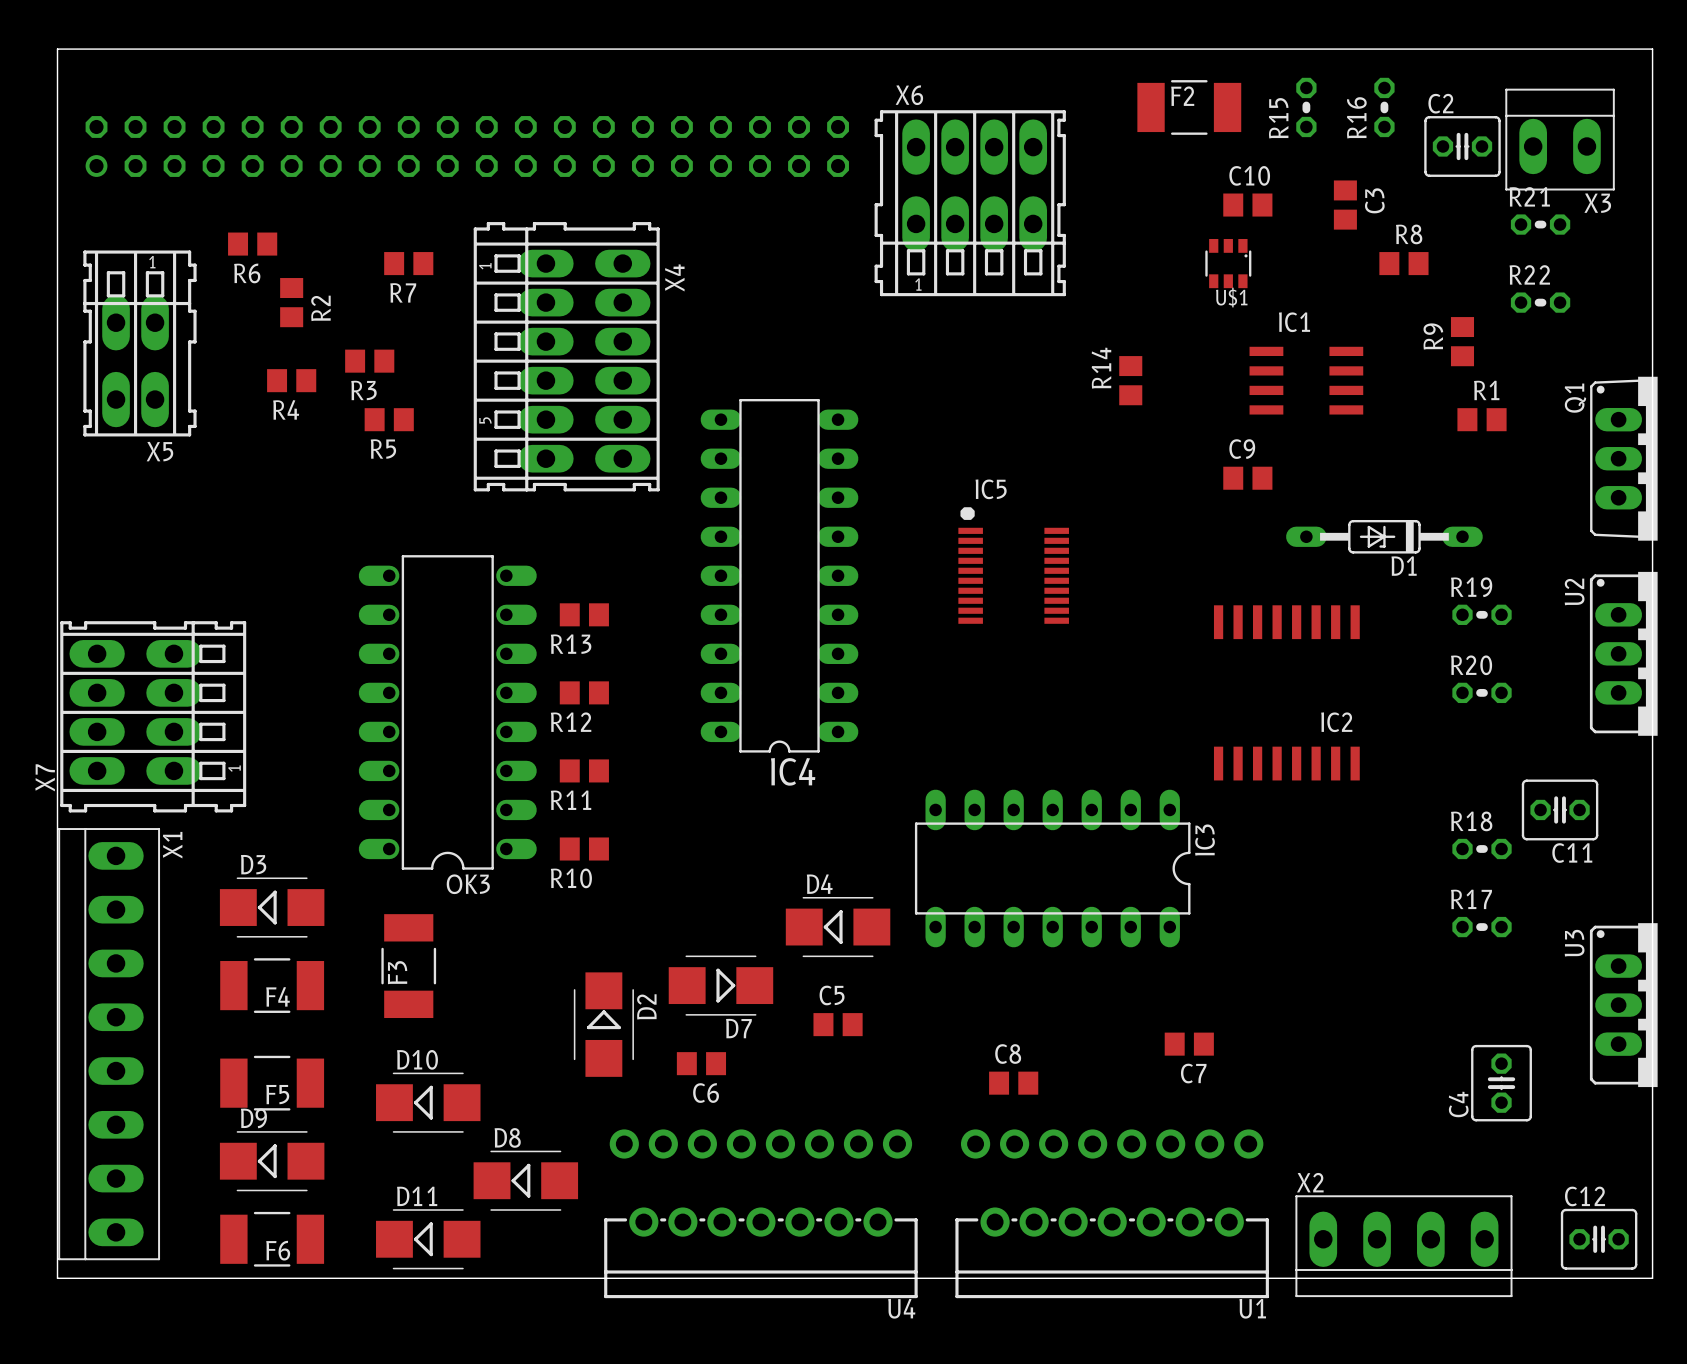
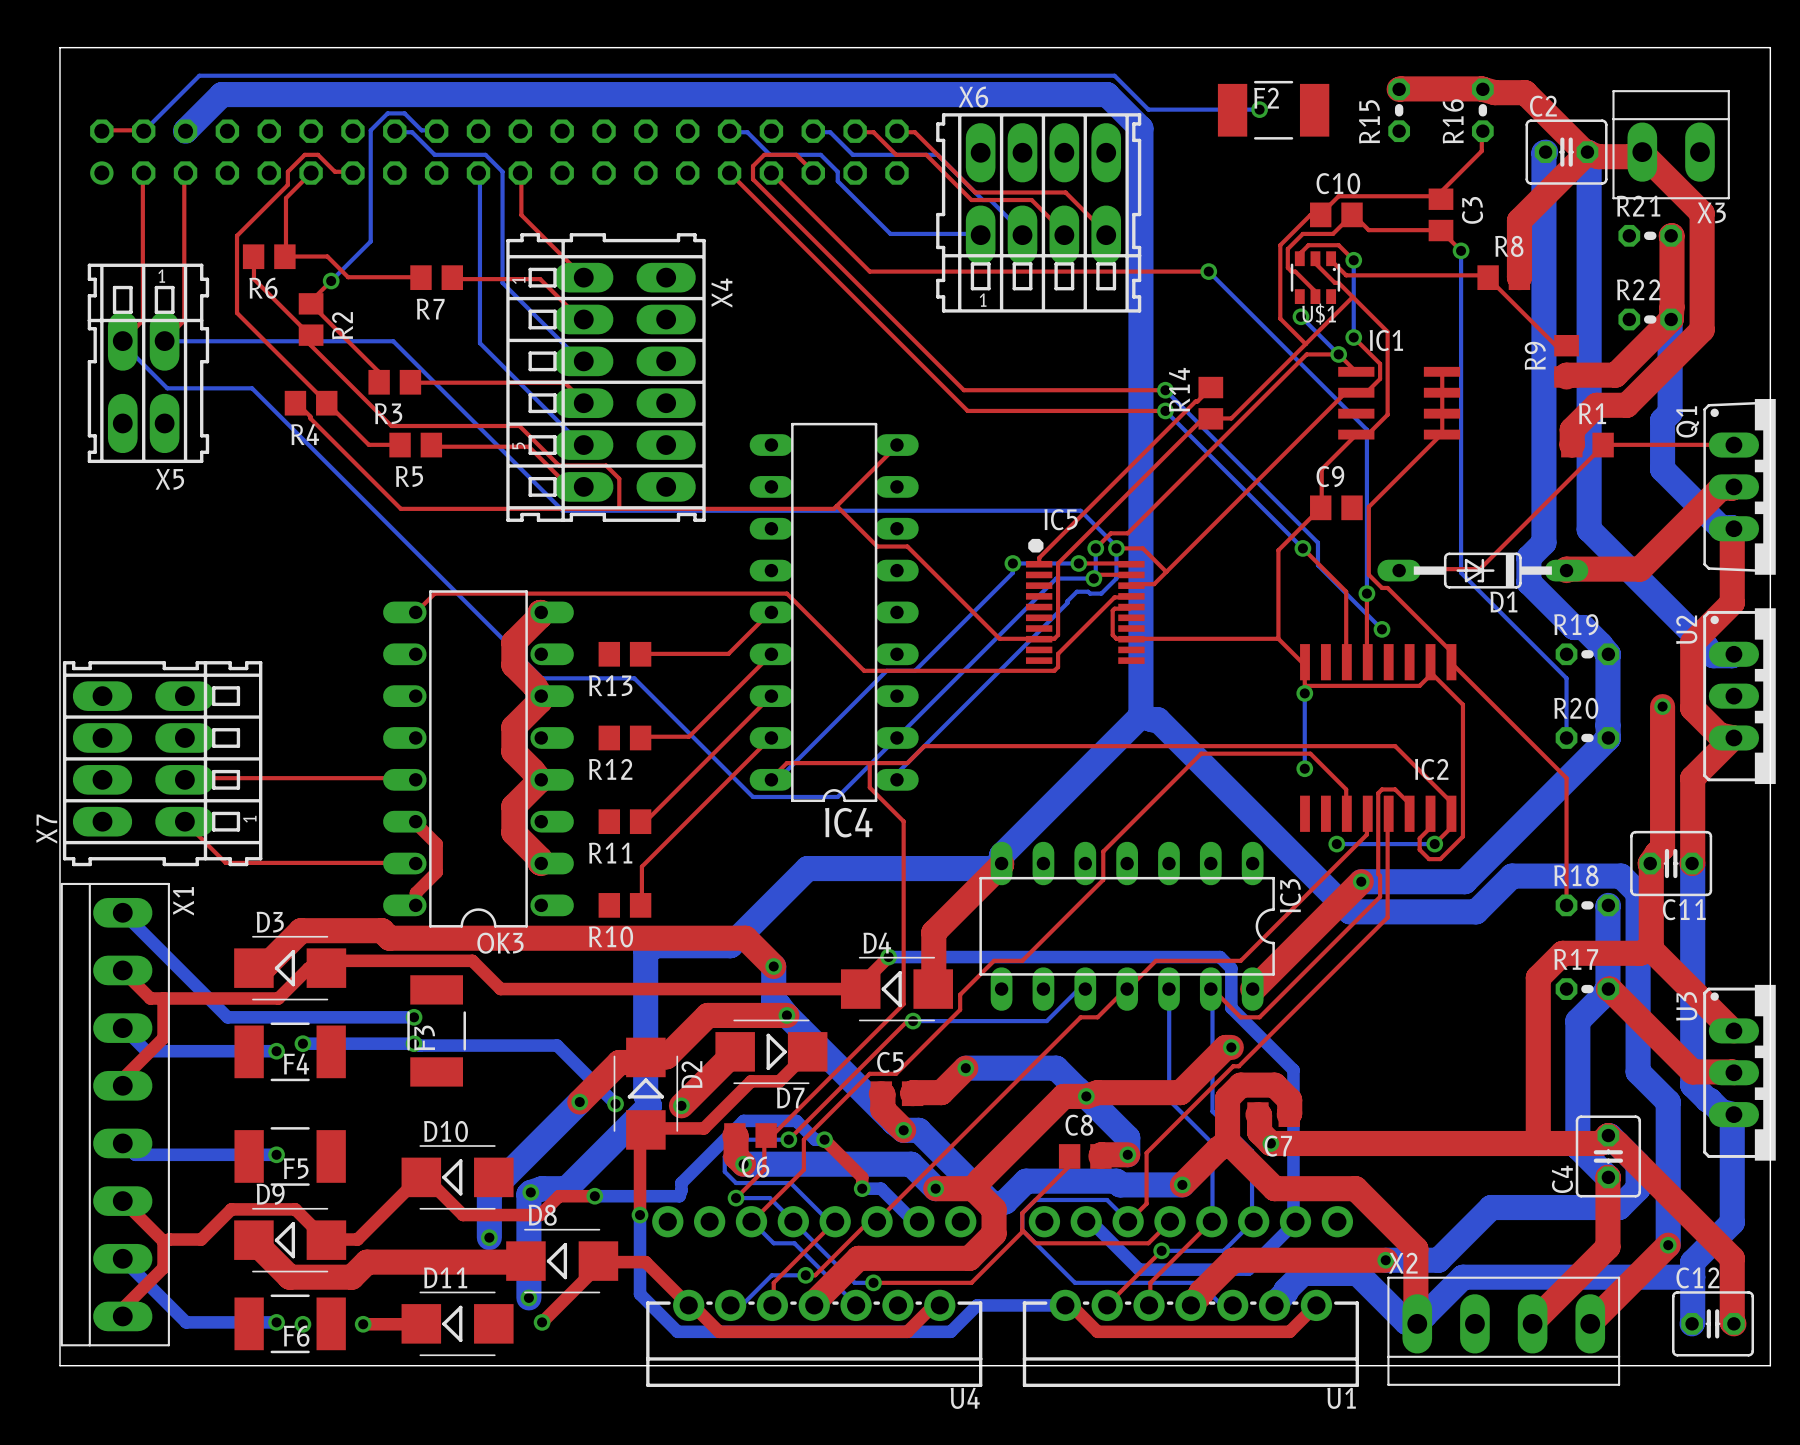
top track: none -> (1399, 89) (1481, 88) (1494, 92) (1525, 92) (1586, 153)
bottom track: none -> (1259, 109) (1148, 109) (1114, 75) (199, 75) (143, 131)
via: none -> (1259, 109)
top track: none -> (101, 131) (143, 131)
bottom track: none -> (185, 131) (221, 94) (1107, 94) (1140, 128) (1140, 716)
bottom track: none -> (394, 131) (412, 132) (434, 154) (485, 154) (502, 171) (502, 282) (579, 360) (583, 361)
bottom track: none -> (436, 131) (421, 130) (404, 113) (387, 113) (370, 130) (370, 241) (331, 281)
bottom track: none -> (729, 131) (747, 132) (769, 154) (820, 154) (837, 171) (837, 181) (890, 233) (980, 235)
bottom track: none -> (813, 131) (830, 132) (852, 154) (937, 154) (982, 200) (990, 200) (1024, 233) (1022, 235)
top track: none -> (855, 131) (873, 132) (896, 154) (926, 154) (971, 200) (1031, 200) (1065, 233) (1064, 235)
top track: none -> (896, 131) (914, 132) (975, 192) (1065, 192) (1106, 235)
top track: none -> (1482, 131) (1481, 151) (1438, 194) (1440, 199) (1438, 196) (1338, 196) (1320, 214) (1310, 215) (1280, 245) (1280, 318) (1305, 344)
bottom track: none -> (1545, 152) (1543, 152) (1543, 542) (1528, 557) (1528, 582) (1574, 627) (1583, 627) (1608, 654) (1608, 737) (1464, 881) (1361, 881)
bottom track: none -> (1587, 152) (1589, 152) (1589, 529) (1713, 655) (1733, 654)
top track: none -> (1587, 152) (1519, 220) (1519, 277)
top track: none -> (1587, 152) (1598, 156) (1630, 156) (1642, 152) (1702, 213) (1702, 329) (1626, 405) (1596, 405) (1572, 429) (1571, 445)
top track: none -> (143, 173) (142, 320) (122, 341)
top track: none -> (185, 173) (184, 320) (164, 341)
top track: none -> (311, 173) (285, 198) (284, 256) (327, 256) (348, 277) (420, 277)
top track: none -> (352, 173) (334, 171) (317, 154) (304, 154) (287, 171) (287, 184) (237, 235) (237, 313) (368, 444) (400, 445)
bottom track: none -> (478, 173) (479, 343) (583, 446) (583, 445)
top track: none -> (520, 173) (521, 215) (583, 277)
top track: none -> (729, 173) (967, 410) (1165, 410)
top track: none -> (771, 173) (869, 271) (1208, 271)
top track: none -> (813, 173) (796, 154) (764, 154) (753, 166) (753, 179) (963, 390) (1165, 390)
top track: none -> (1352, 214) (1368, 230) (1440, 230) (1461, 250)
top track: none -> (1351, 215) (1333, 233) (1302, 233) (1287, 248) (1287, 267) (1291, 271) (1295, 271) (1314, 290) (1315, 296)
top track: none -> (1671, 235) (1671, 319) (1615, 375) (1566, 375) (1566, 377)
bottom track: none -> (1461, 250) (1461, 572) (1566, 678) (1566, 737)
via: none -> (1461, 250)
top track: none -> (253, 256) (253, 279) (311, 335) (310, 345) (391, 426) (519, 426) (559, 465) (606, 465) (619, 478) (619, 508)
top track: none -> (1299, 258) (1301, 252) (1308, 245) (1338, 245) (1353, 260)
top track: none -> (1315, 258) (1316, 264) (1334, 282) (1338, 282) (1387, 331) (1387, 414) (1368, 433) (1357, 433) (1321, 469) (1321, 506) (1278, 550) (1278, 638)
top track: none -> (1331, 258) (1346, 275) (1485, 275) (1555, 345) (1566, 345)
bottom track: none -> (1353, 260) (1353, 337)
via: none -> (1353, 260)
bottom track: none -> (1208, 271) (1366, 429) (1366, 593)
via: none -> (1208, 271)
top track: none -> (452, 277) (540, 279) (579, 318) (583, 319)
top track: none -> (331, 281) (310, 301) (311, 303) (378, 371) (379, 382)
via: none -> (331, 281)
top track: none -> (1352, 297) (1231, 418) (1203, 418) (1058, 563) (1058, 635) (1054, 638) (999, 638) (907, 546) (877, 546) (836, 506)
bottom track: none -> (1301, 316) (1338, 354)
via: none -> (1301, 316)
bottom track: none -> (1671, 319) (1670, 412) (1662, 420) (1662, 469) (1720, 527) (1733, 528)
top track: none -> (1353, 337) (1380, 363) (1380, 378) (1366, 392) (1344, 393) (1154, 584) (1131, 585)
via: none -> (1353, 337)
bottom track: none -> (122, 341) (124, 345) (167, 388) (252, 388) (542, 678) (634, 678) (753, 796) (837, 796) (1056, 578) (1095, 578) (1095, 548)
bottom track: none -> (164, 341) (393, 341) (562, 510) (1080, 510) (1116, 546) (1116, 578) (1101, 593) (1076, 591) (898, 772) (896, 779)
via: none -> (1338, 354)
top track: none -> (1356, 371) (1338, 354) (1306, 354) (1127, 533) (1110, 533) (1095, 548)
top track: none -> (1441, 371) (1441, 434) (1368, 506) (1368, 574) (1381, 587) (1387, 587) (1449, 650) (1449, 661) (1566, 778) (1566, 905)
top track: none -> (410, 382) (564, 382) (583, 403)
top track: none -> (1210, 387) (1039, 557) (1039, 564)
bottom track: none -> (1165, 390) (1317, 542) (1317, 565) (1381, 629)
via: none -> (1165, 390)
top track: none -> (295, 403) (400, 508) (833, 508) (896, 445)
bottom track: none -> (1165, 410) (1302, 548)
via: none -> (1165, 410)
top track: none -> (431, 445) (432, 446) (528, 446) (568, 486) (583, 486)
top track: none -> (1733, 445) (1603, 445) (1479, 569) (1399, 570)
top track: none -> (1733, 486) (1720, 488) (1639, 569) (1566, 570)
top track: none -> (1733, 528) (1732, 529) (1732, 603) (1692, 642) (1692, 708) (1719, 734) (1733, 737) (1692, 778) (1692, 863)
via: none -> (1095, 548)
top track: none -> (1116, 548) (1142, 548) (1166, 571)
via: none -> (1116, 548)
top track: none -> (1302, 548) (1346, 591) (1346, 662)
via: none -> (1302, 548)
via: none -> (1012, 563)
top track: none -> (1078, 563) (1131, 564)
bottom track: none -> (1078, 563) (1012, 563) (1012, 572) (914, 670) (886, 670) (779, 778) (771, 778) (771, 779)
via: none -> (1078, 563)
top track: none -> (1131, 574) (1097, 574) (1093, 578)
via: none -> (1093, 578)
top track: none -> (1366, 593) (1367, 662)
via: none -> (1366, 593)
top track: none -> (1131, 596) (1114, 597) (1058, 653) (1058, 667) (1054, 670) (864, 670) (786, 593) (434, 593) (415, 612)
top track: none -> (1131, 607) (1114, 608) (1112, 610) (1112, 635) (1116, 638) (1278, 638)
top track: none -> (541, 612) (540, 616) (513, 642) (513, 665) (534, 685) (541, 696) (540, 700) (513, 727) (513, 751) (540, 780)
top track: none -> (771, 612) (728, 653) (640, 654)
via: none -> (1381, 629)
top track: none -> (1278, 638) (1302, 663) (1304, 662) (1304, 693) (1306, 685) (1419, 685) (1430, 674) (1430, 662) (1430, 672) (1462, 704) (1462, 836) (1440, 859) (1429, 859) (1419, 849) (1419, 838) (1429, 829) (1430, 813)
top track: none -> (771, 654) (688, 736) (640, 737)
bottom track: none -> (1304, 693) (1304, 768)
via: none -> (1304, 693)
top track: none -> (771, 696) (645, 821) (640, 821)
top track: none -> (1662, 706) (1662, 847) (1650, 863) (1651, 949)
via: none -> (1662, 706)
bottom track: none -> (1140, 716) (1001, 855) (1001, 863) (990, 868) (807, 868) (730, 945) (656, 945) (645, 949) (645, 1094) (649, 1105) (566, 1188) (542, 1188) (528, 1194) (528, 1297)
bottom track: none -> (1140, 716) (1157, 719) (1349, 911) (1476, 911) (1511, 876) (1621, 876) (1638, 893) (1638, 1071) (1668, 1102) (1668, 1245)
top track: none -> (771, 737) (641, 866) (640, 905)
top track: none -> (869, 763) (869, 787) (903, 821) (903, 1004) (771, 1135) (764, 1135) (764, 1169) (736, 1198)
via: none -> (1304, 768)
top track: none -> (184, 779) (186, 778) (414, 778) (415, 779)
top track: none -> (771, 779) (786, 763) (907, 763) (924, 746) (1395, 746) (1449, 800) (1451, 813) (1449, 813) (1449, 829) (1434, 844)
top track: none -> (540, 780) (513, 806) (513, 832) (540, 859) (541, 863)
top track: none -> (1346, 813) (1346, 789) (1310, 753) (1201, 753) (1103, 851) (1103, 879) (1022, 960) (994, 960) (960, 994) (960, 1009) (896, 1073) (869, 1073) (803, 1139) (803, 1169) (751, 1221)
top track: none -> (1367, 813) (1366, 834) (1240, 960) (1156, 960) (1097, 1017) (1080, 1017) (877, 1221) (867, 1222) (815, 1275) (805, 1275)
top track: none -> (1388, 813) (1387, 917) (1238, 1066) (1233, 1066) (1146, 1152) (1146, 1203) (1128, 1221)
top track: none -> (1409, 813) (1408, 802) (1395, 789) (1381, 789) (1378, 793) (1380, 896) (1259, 1017) (1240, 1017) (1210, 989)
top track: none -> (184, 821) (225, 862) (415, 863)
top track: none -> (415, 821) (436, 844) (436, 872) (415, 893) (415, 905)
bottom track: none -> (1336, 844) (1434, 844)
via: none -> (1336, 844)
via: none -> (1434, 844)
top track: none -> (1001, 863) (933, 932) (933, 989)
bottom track: none -> (1692, 863) (1692, 1085) (1720, 1111) (1733, 1114) (1732, 1115) (1732, 1222) (1692, 1262) (1692, 1323)
top track: none -> (1361, 881) (1252, 989)
via: none -> (1361, 881)
bottom track: none -> (1608, 905) (1607, 989)
bottom track: none -> (122, 912) (227, 1017) (414, 1017)
top track: none -> (1651, 949) (1733, 1030)
top track: none -> (1651, 949) (1639, 953) (1562, 953) (1538, 977) (1538, 1143)
top track: none -> (888, 957) (862, 983) (860, 989) (500, 989) (472, 960) (334, 960) (326, 968) (308, 968) (278, 998) (150, 998) (122, 970)
bottom track: none -> (888, 957) (1220, 957) (1231, 968) (1231, 1007) (1293, 1070) (1293, 1216) (1295, 1222) (1248, 1269) (1139, 1269) (1091, 1222) (1086, 1221)
via: none -> (888, 957)
top track: none -> (773, 966) (745, 938) (389, 938) (382, 930) (301, 930) (265, 966) (253, 966) (253, 968)
bottom track: none -> (773, 966) (773, 1000) (786, 1015) (894, 1122) (903, 1130) (918, 1130) (994, 1205) (1005, 1201) (1026, 1181) (1116, 1181) (1120, 1184) (1182, 1184)
via: none -> (773, 966)
bottom track: none -> (1085, 989) (1078, 989) (1046, 1021) (913, 1021)
bottom track: none -> (1169, 989) (1169, 1100) (1212, 1143) (1211, 1221)
bottom track: none -> (1210, 989) (1212, 989) (1212, 1111) (1252, 1151) (1252, 1220) (1253, 1221) (1223, 1250) (1161, 1250)
top track: none -> (1608, 989) (1692, 1071) (1733, 1072)
bottom track: none -> (1607, 989) (1577, 1021) (1577, 1147) (1608, 1177)
top track: none -> (163, 998) (163, 1038) (124, 1077) (122, 1085)
top track: none -> (786, 1015) (707, 1015) (666, 1056) (647, 1056) (634, 1062) (619, 1062) (579, 1102)
via: none -> (786, 1015)
via: none -> (414, 1017)
top track: none -> (913, 1021) (907, 1021) (788, 1139)
via: none -> (913, 1021)
bottom track: none -> (122, 1028) (146, 1051) (276, 1051)
bottom track: none -> (302, 1043) (557, 1045) (615, 1103)
via: none -> (302, 1043)
via: none -> (414, 1043)
top track: none -> (1231, 1047) (1225, 1047) (1180, 1092) (1097, 1092) (1086, 1096) (1063, 1096) (973, 1188)
via: none -> (1231, 1047)
via: none -> (276, 1051)
top track: none -> (735, 1051) (681, 1105)
top track: none -> (807, 1051) (779, 1081) (751, 1081) (704, 1128) (647, 1128) (640, 1134) (640, 1215)
top track: none -> (965, 1068) (941, 1092) (912, 1093)
bottom track: none -> (965, 1068) (1056, 1068) (1127, 1137) (1127, 1154)
via: none -> (965, 1068)
top track: none -> (881, 1093) (882, 1094) (882, 1109) (903, 1130)
via: none -> (1086, 1096)
bottom track: none -> (579, 1102) (489, 1192) (489, 1237)
via: none -> (579, 1102)
via: none -> (615, 1103)
via: none -> (681, 1105)
top track: none -> (1257, 1114) (1259, 1115) (1259, 1132) (1270, 1143) (1600, 1143) (1608, 1135)
top track: none -> (1289, 1114) (1289, 1100) (1274, 1085) (1240, 1085) (1227, 1098) (1227, 1141)
via: none -> (903, 1130)
top track: none -> (734, 1135) (736, 1156) (743, 1164)
bottom track: none -> (1608, 1135) (1638, 1164) (1638, 1188) (1619, 1207) (1491, 1207) (1438, 1260) (1385, 1260)
top track: none -> (1607, 1135) (1732, 1258) (1732, 1322) (1733, 1323)
bottom track: none -> (788, 1139) (741, 1139) (724, 1156) (724, 1171) (736, 1183) (790, 1183) (828, 1220) (835, 1221)
via: none -> (788, 1139)
top track: none -> (824, 1139) (862, 1177) (862, 1188)
bottom track: none -> (824, 1139) (815, 1139) (796, 1120) (743, 1120) (681, 1183) (679, 1196) (594, 1196)
via: none -> (824, 1139)
top track: none -> (1227, 1141) (1274, 1188) (1355, 1188) (1415, 1248) (1417, 1323)
top track: none -> (1227, 1141) (1182, 1184)
bottom track: none -> (122, 1143) (135, 1154) (276, 1154)
via: none -> (1270, 1143)
via: none -> (276, 1154)
top track: none -> (1127, 1154) (1101, 1154) (1100, 1156)
via: none -> (1127, 1154)
top track: none -> (1069, 1156) (1069, 1166) (1022, 1213) (1022, 1232) (971, 1282) (873, 1282)
bottom track: none -> (743, 1164) (911, 1164) (935, 1188)
via: none -> (743, 1164)
top track: none -> (1608, 1177) (1607, 1247) (1532, 1323)
via: none -> (1182, 1184)
bottom track: none -> (862, 1188) (881, 1188) (913, 1220) (918, 1221)
via: none -> (862, 1188)
top track: none -> (935, 1188) (973, 1188)
via: none -> (935, 1188)
top track: none -> (973, 1188) (994, 1209) (994, 1233) (969, 1258) (858, 1258) (813, 1303) (814, 1305)
via: none -> (530, 1192)
top track: none -> (594, 1196) (559, 1196) (540, 1215) (463, 1215) (427, 1179) (419, 1177) (357, 1239) (326, 1240) (295, 1209) (231, 1209) (201, 1239) (169, 1239) (163, 1241)
via: none -> (594, 1196)
bottom track: none -> (736, 1198) (769, 1198) (854, 1282) (873, 1282)
via: none -> (736, 1198)
top track: none -> (122, 1201) (163, 1241)
bottom track: none -> (640, 1215) (640, 1294) (677, 1331) (950, 1331) (977, 1305) (1065, 1305)
via: none -> (640, 1215)
bottom track: none -> (751, 1221) (773, 1243) (794, 1243) (856, 1305)
top track: none -> (835, 1221) (773, 1282) (772, 1305)
bottom track: none -> (1128, 1221) (1107, 1199) (1035, 1199) (1022, 1213) (1022, 1230) (1075, 1282) (1199, 1282) (1220, 1303) (1231, 1303) (1232, 1305)
top track: none -> (1169, 1221) (1148, 1243) (1035, 1243) (1022, 1230)
top track: none -> (1211, 1221) (1150, 1282) (1149, 1305)
via: none -> (489, 1237)
top track: none -> (253, 1240) (289, 1277) (351, 1277) (366, 1262) (525, 1261)
top track: none -> (163, 1241) (163, 1267) (124, 1307) (122, 1316)
top track: none -> (1668, 1245) (1590, 1323)
via: none -> (1668, 1245)
top track: none -> (1161, 1250) (1107, 1305)
via: none -> (1161, 1250)
bottom track: none -> (122, 1258) (186, 1322) (276, 1322)
top track: none -> (1385, 1260) (1233, 1260) (1190, 1305)
via: none -> (1385, 1260)
bottom track: none -> (805, 1275) (771, 1275) (743, 1303) (732, 1303) (730, 1305)
via: none -> (805, 1275)
bottom track: none -> (1692, 1277) (1462, 1277) (1417, 1323) (1406, 1322) (1357, 1273) (1302, 1273) (1274, 1305)
via: none -> (873, 1282)
via: none -> (528, 1297)
top track: none -> (939, 1305) (933, 1305) (907, 1331) (719, 1331) (694, 1307) (688, 1305) (645, 1262) (598, 1261) (596, 1267) (542, 1322)
top track: none -> (1065, 1305) (1071, 1305) (1097, 1331) (1289, 1331) (1316, 1305)
via: none -> (276, 1322)
via: none -> (542, 1322)
via: none -> (302, 1324)
via: none -> (363, 1324)
top track: none -> (421, 1323) (363, 1324)

